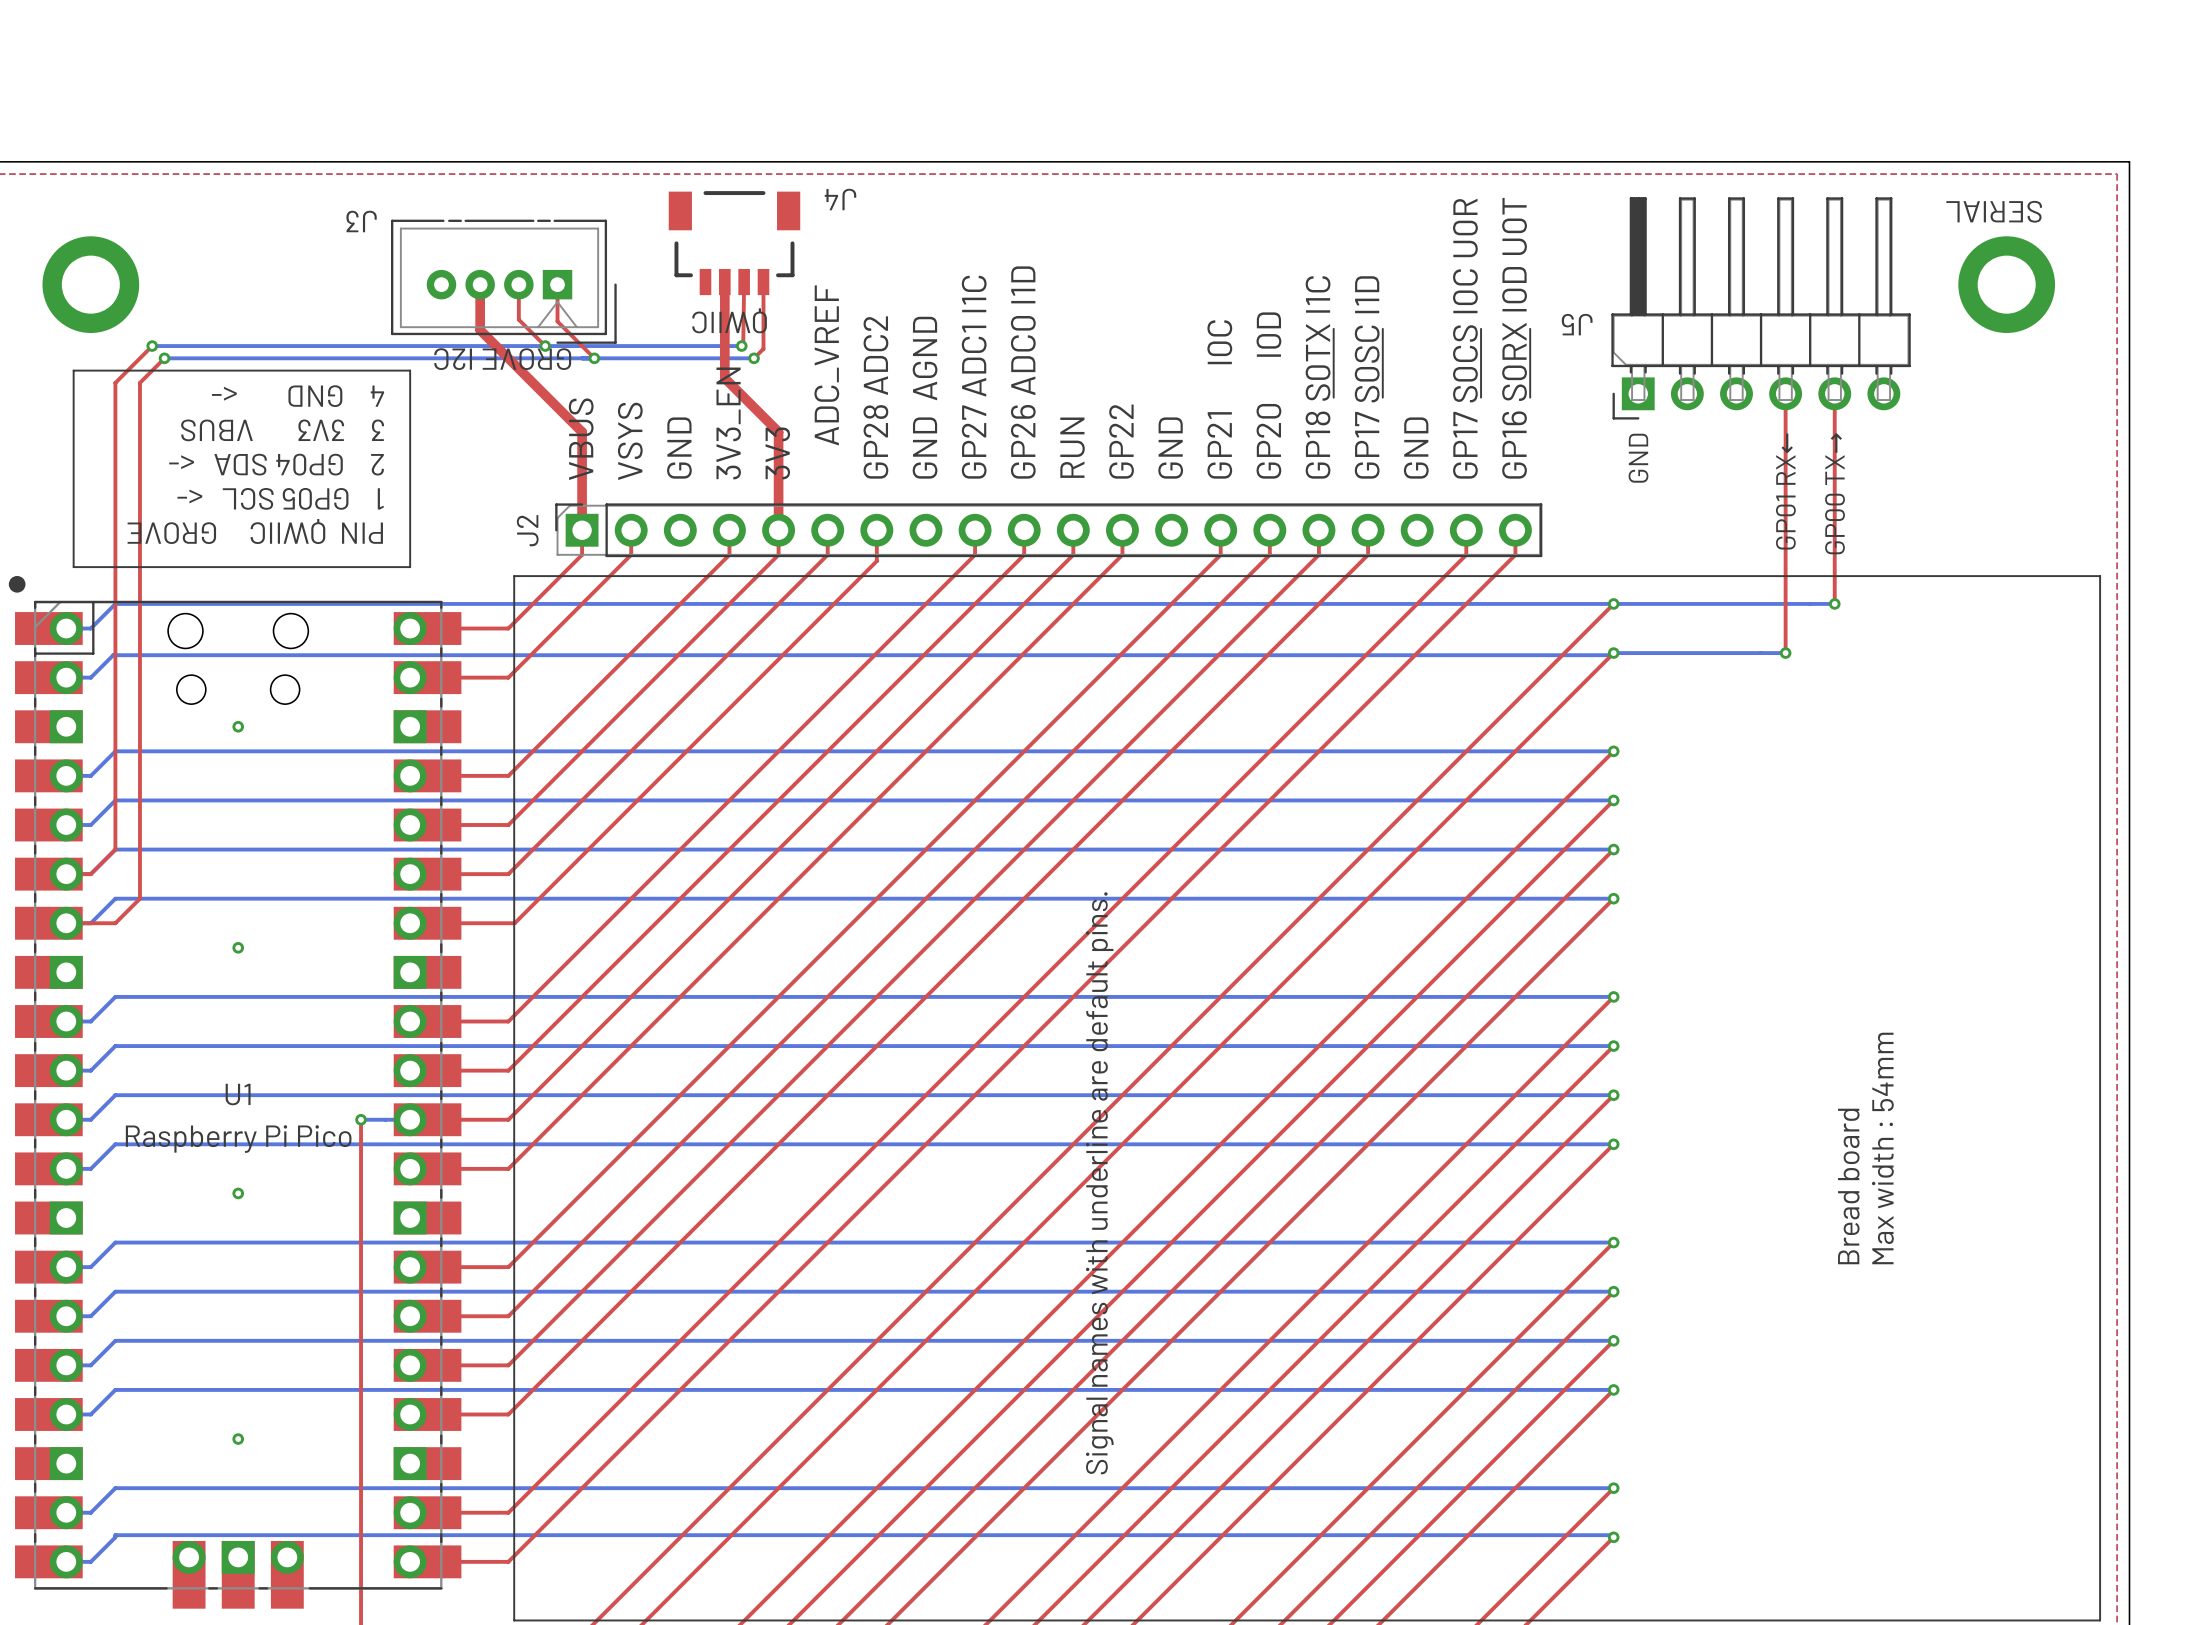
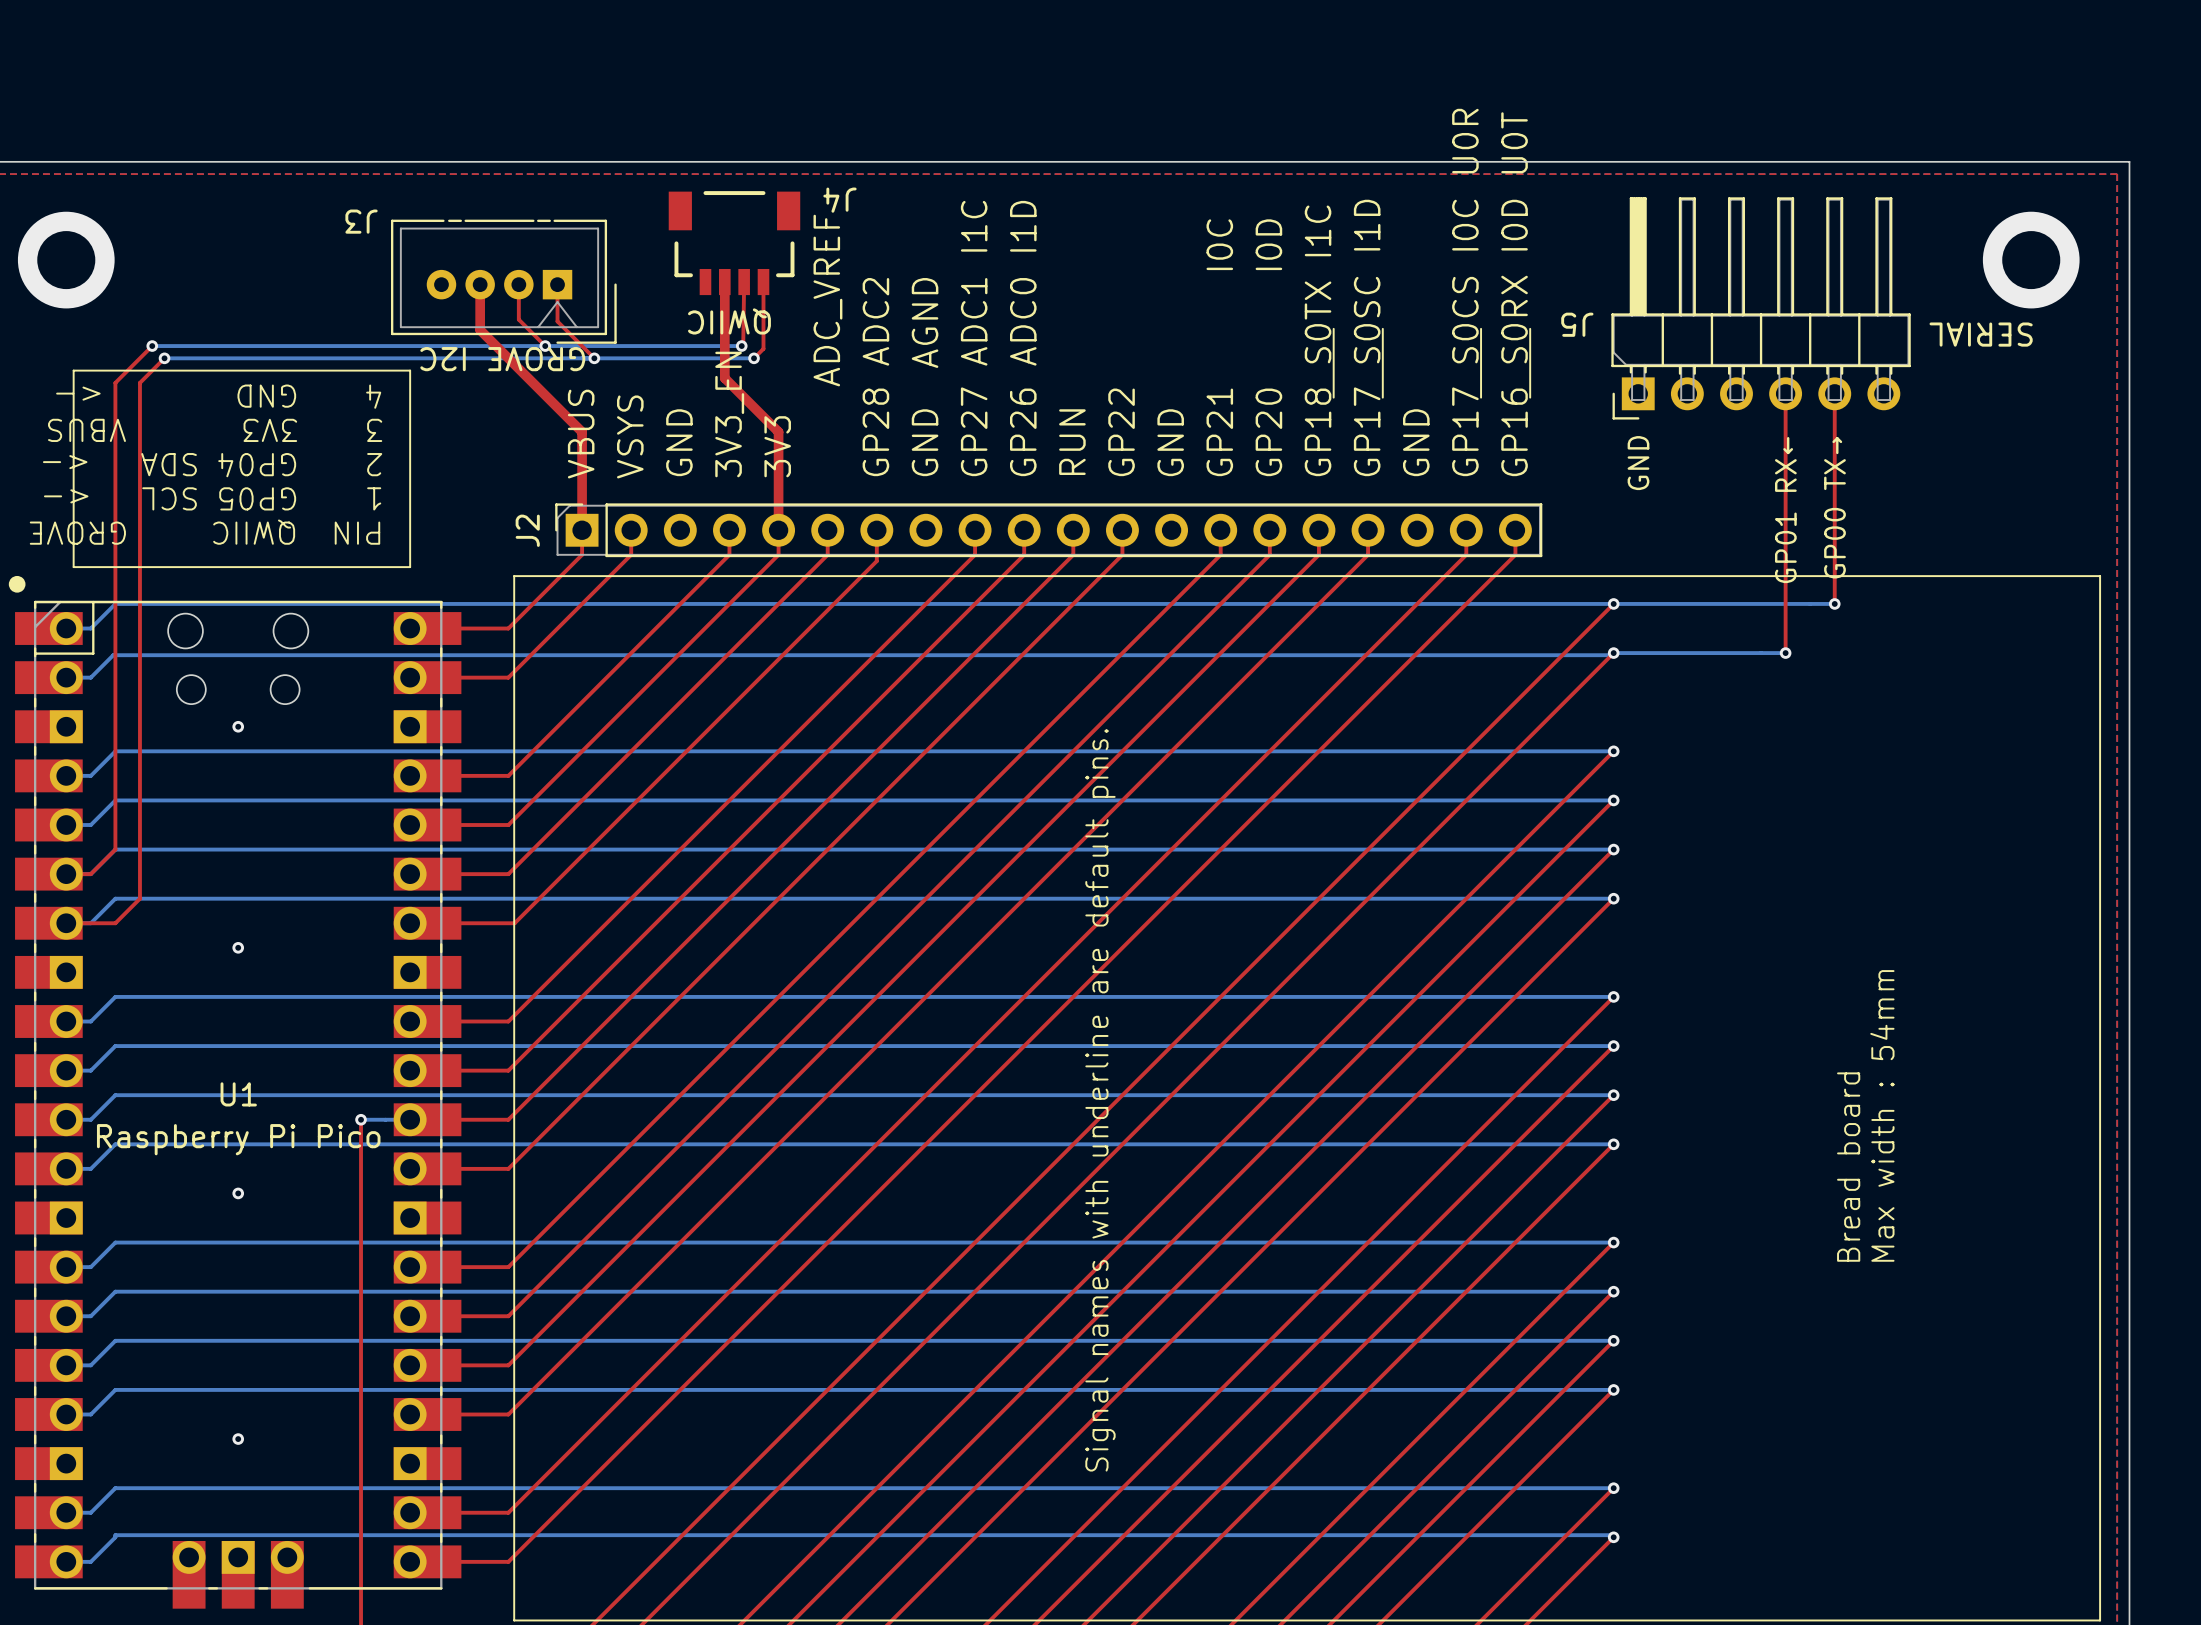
J5 value position: SERIAL (1994, 211) -> SERIAL (1981, 334)
via position: (90, 284) -> (66, 260)
via position: (2006, 284) -> (2031, 260)

